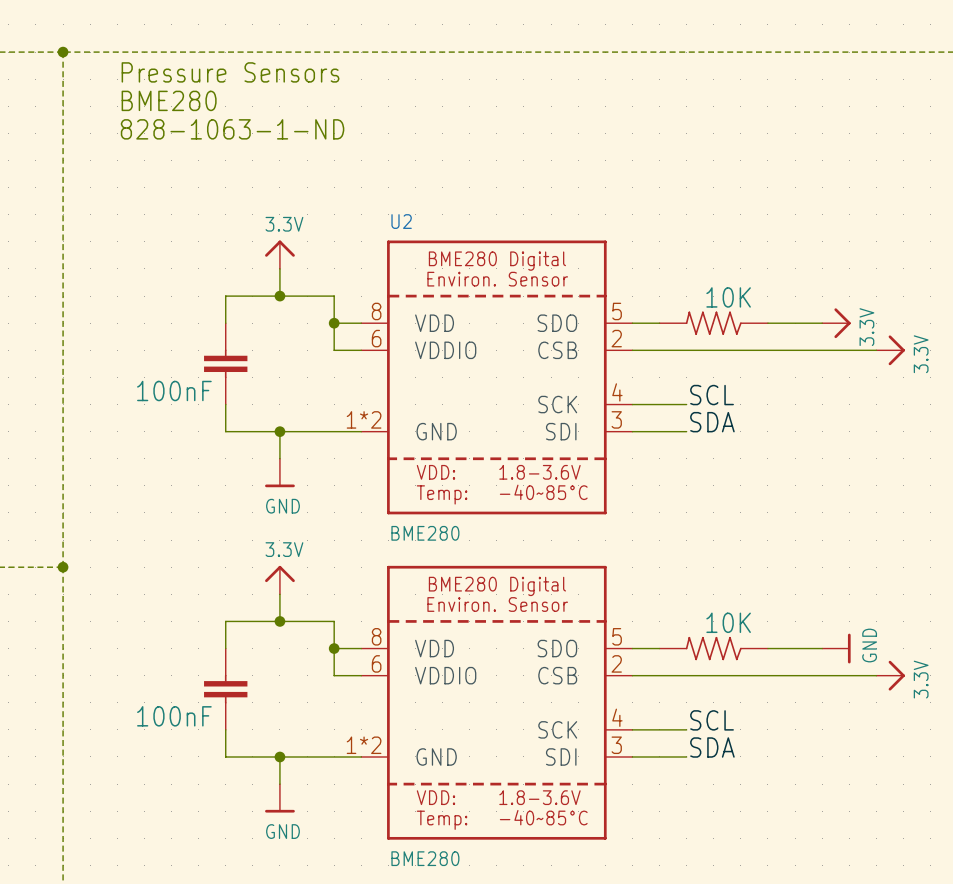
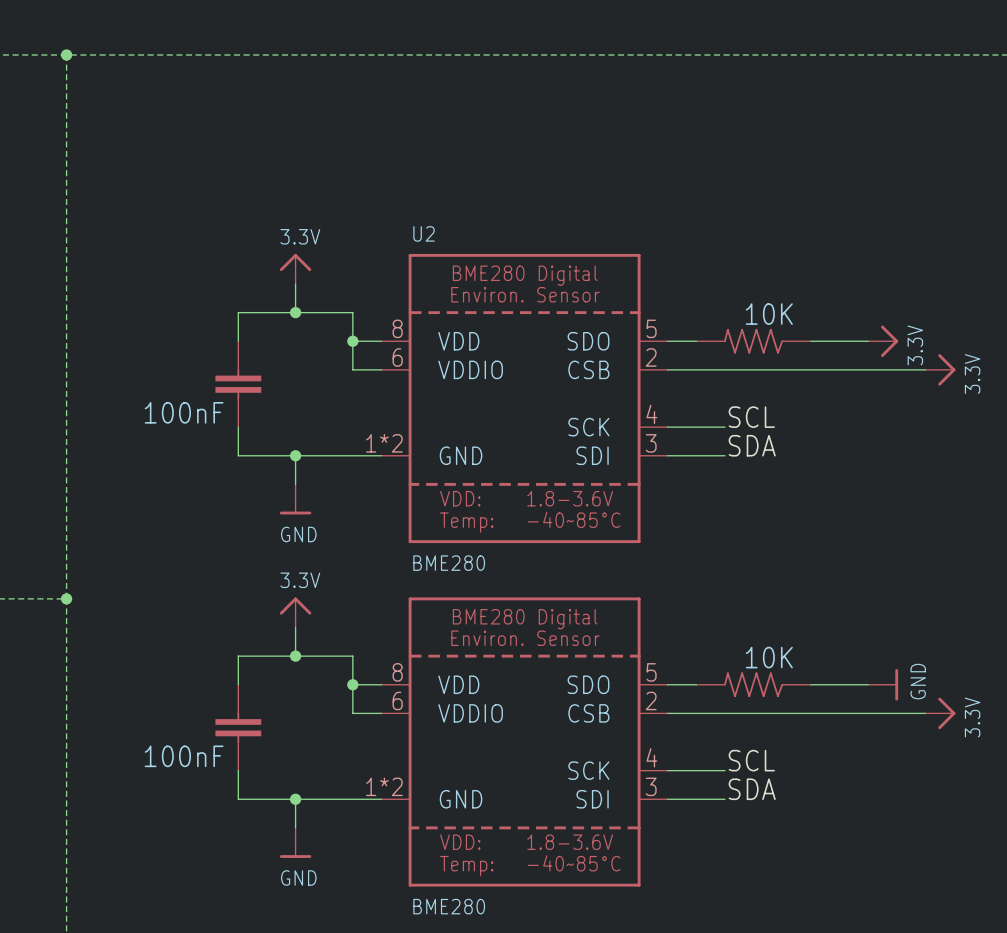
text: Pressure Sensors (230, 72) -> none
text: BME280 (169, 100) -> none
text: 828-1063-1-ND (232, 129) -> none

